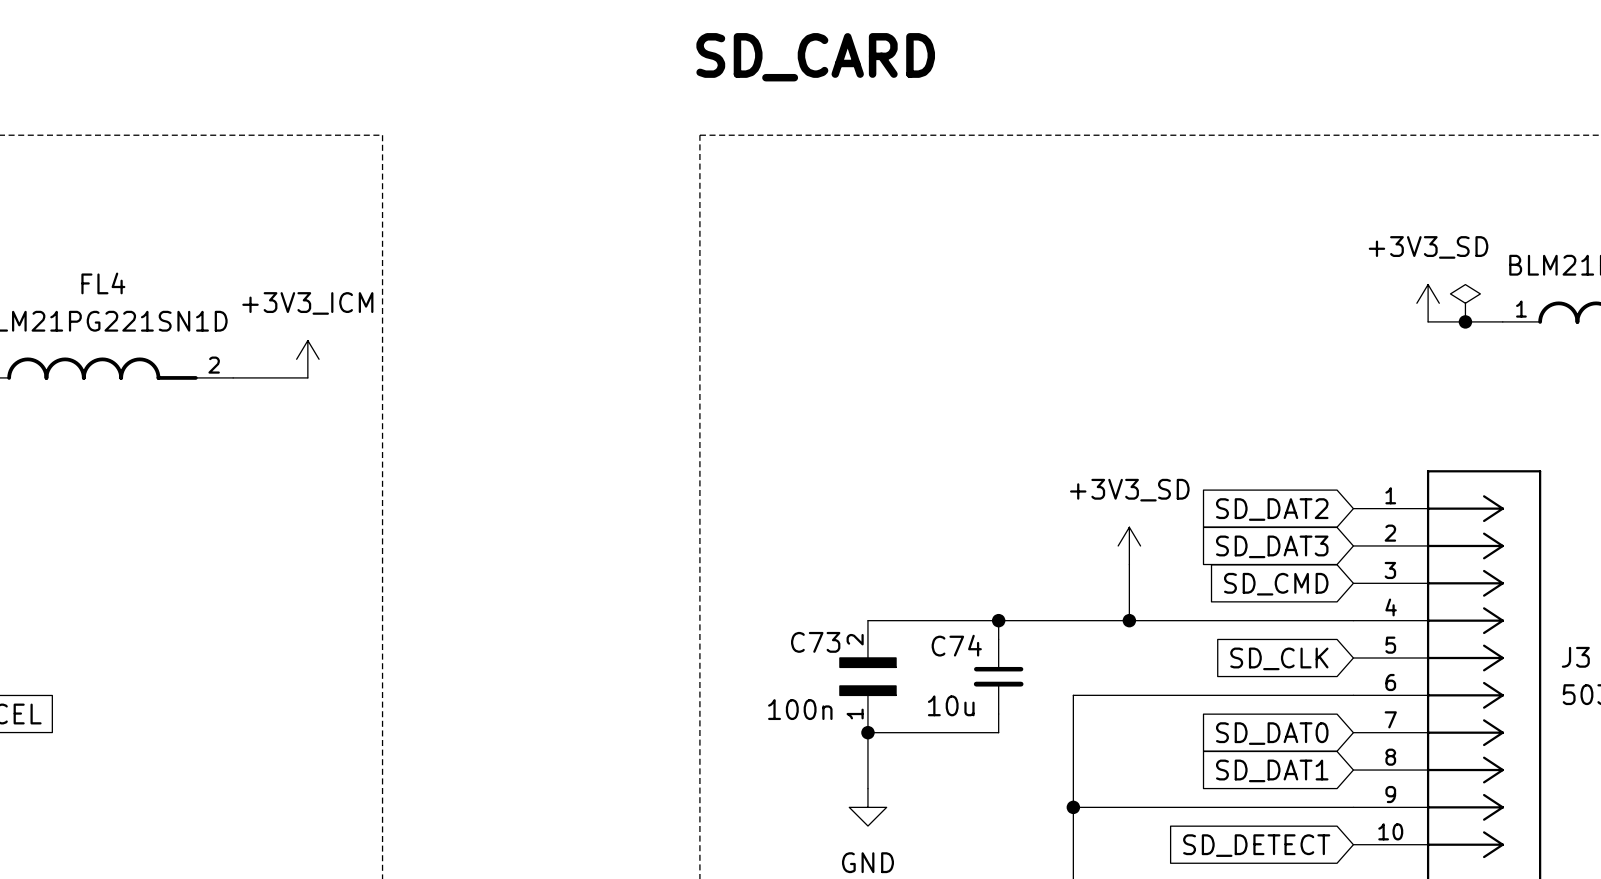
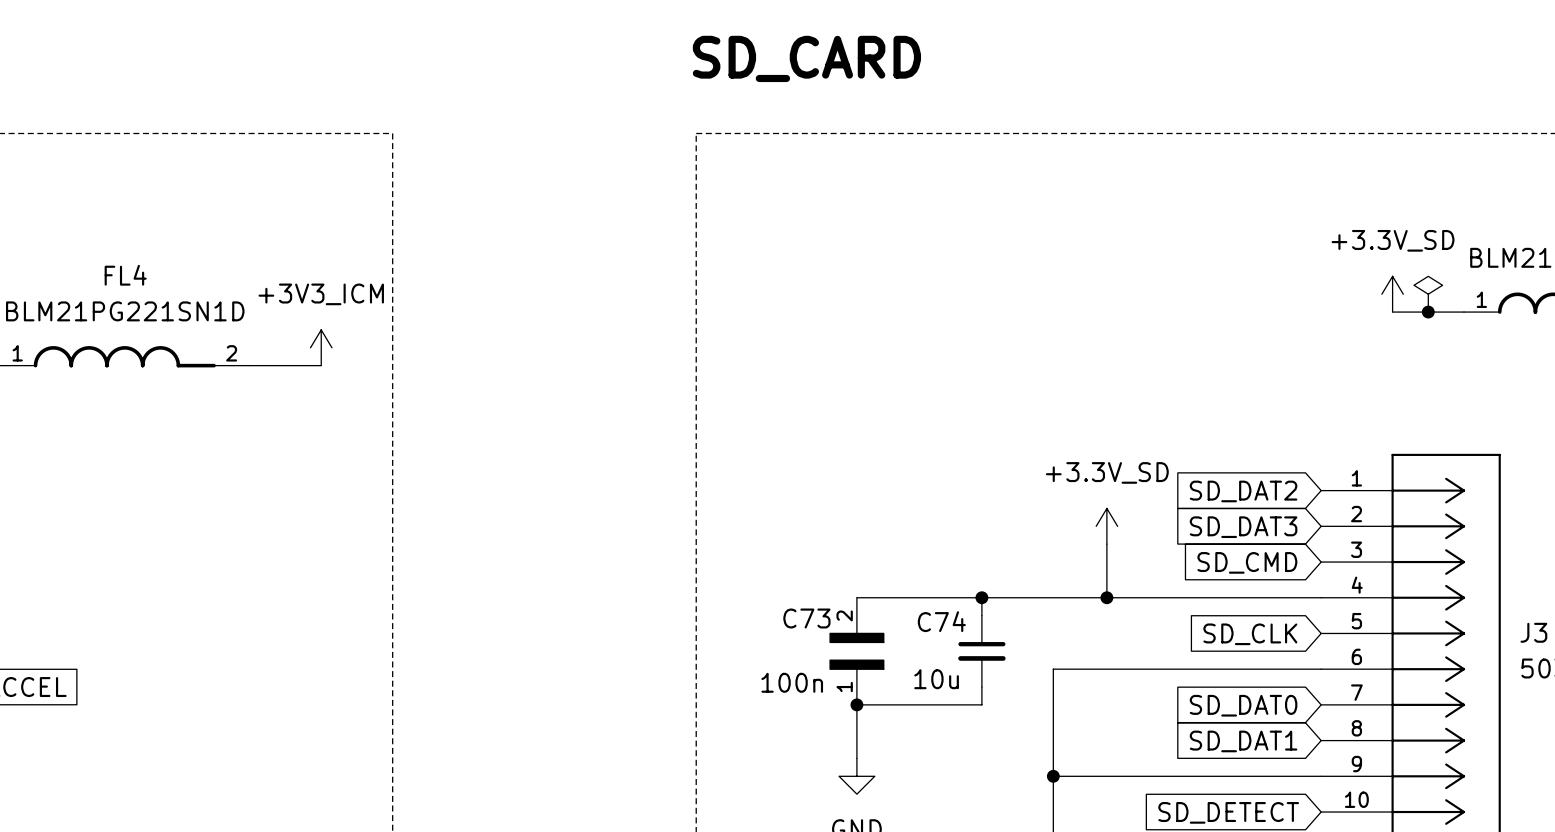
power symbol: +3V3_SD (1428, 303) -> +3.3V_SD (1392, 294)
power symbol: +3V3_SD (1129, 545) -> +3.3V_SD (1106, 526)

